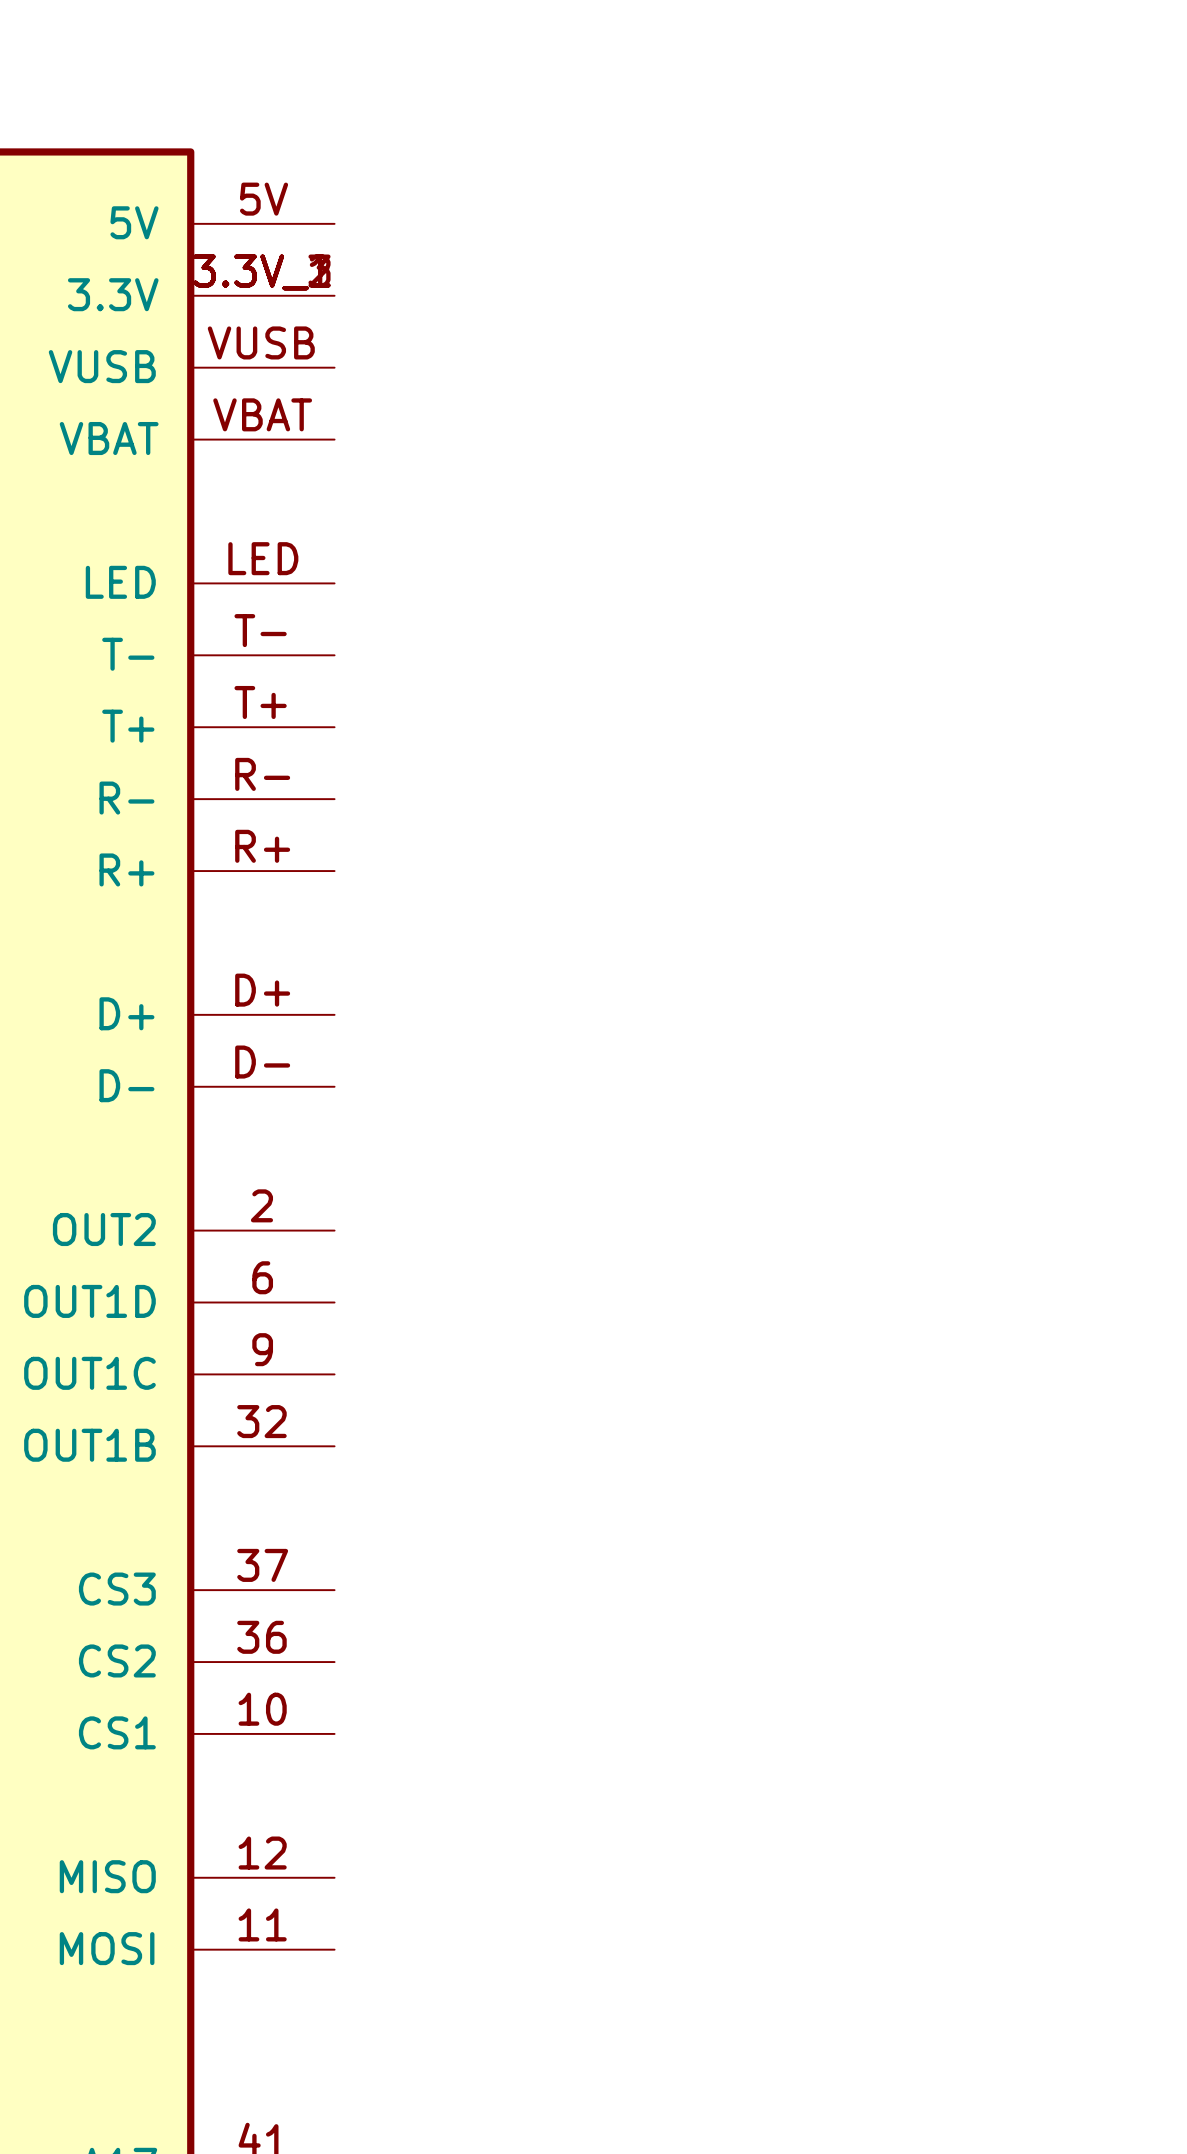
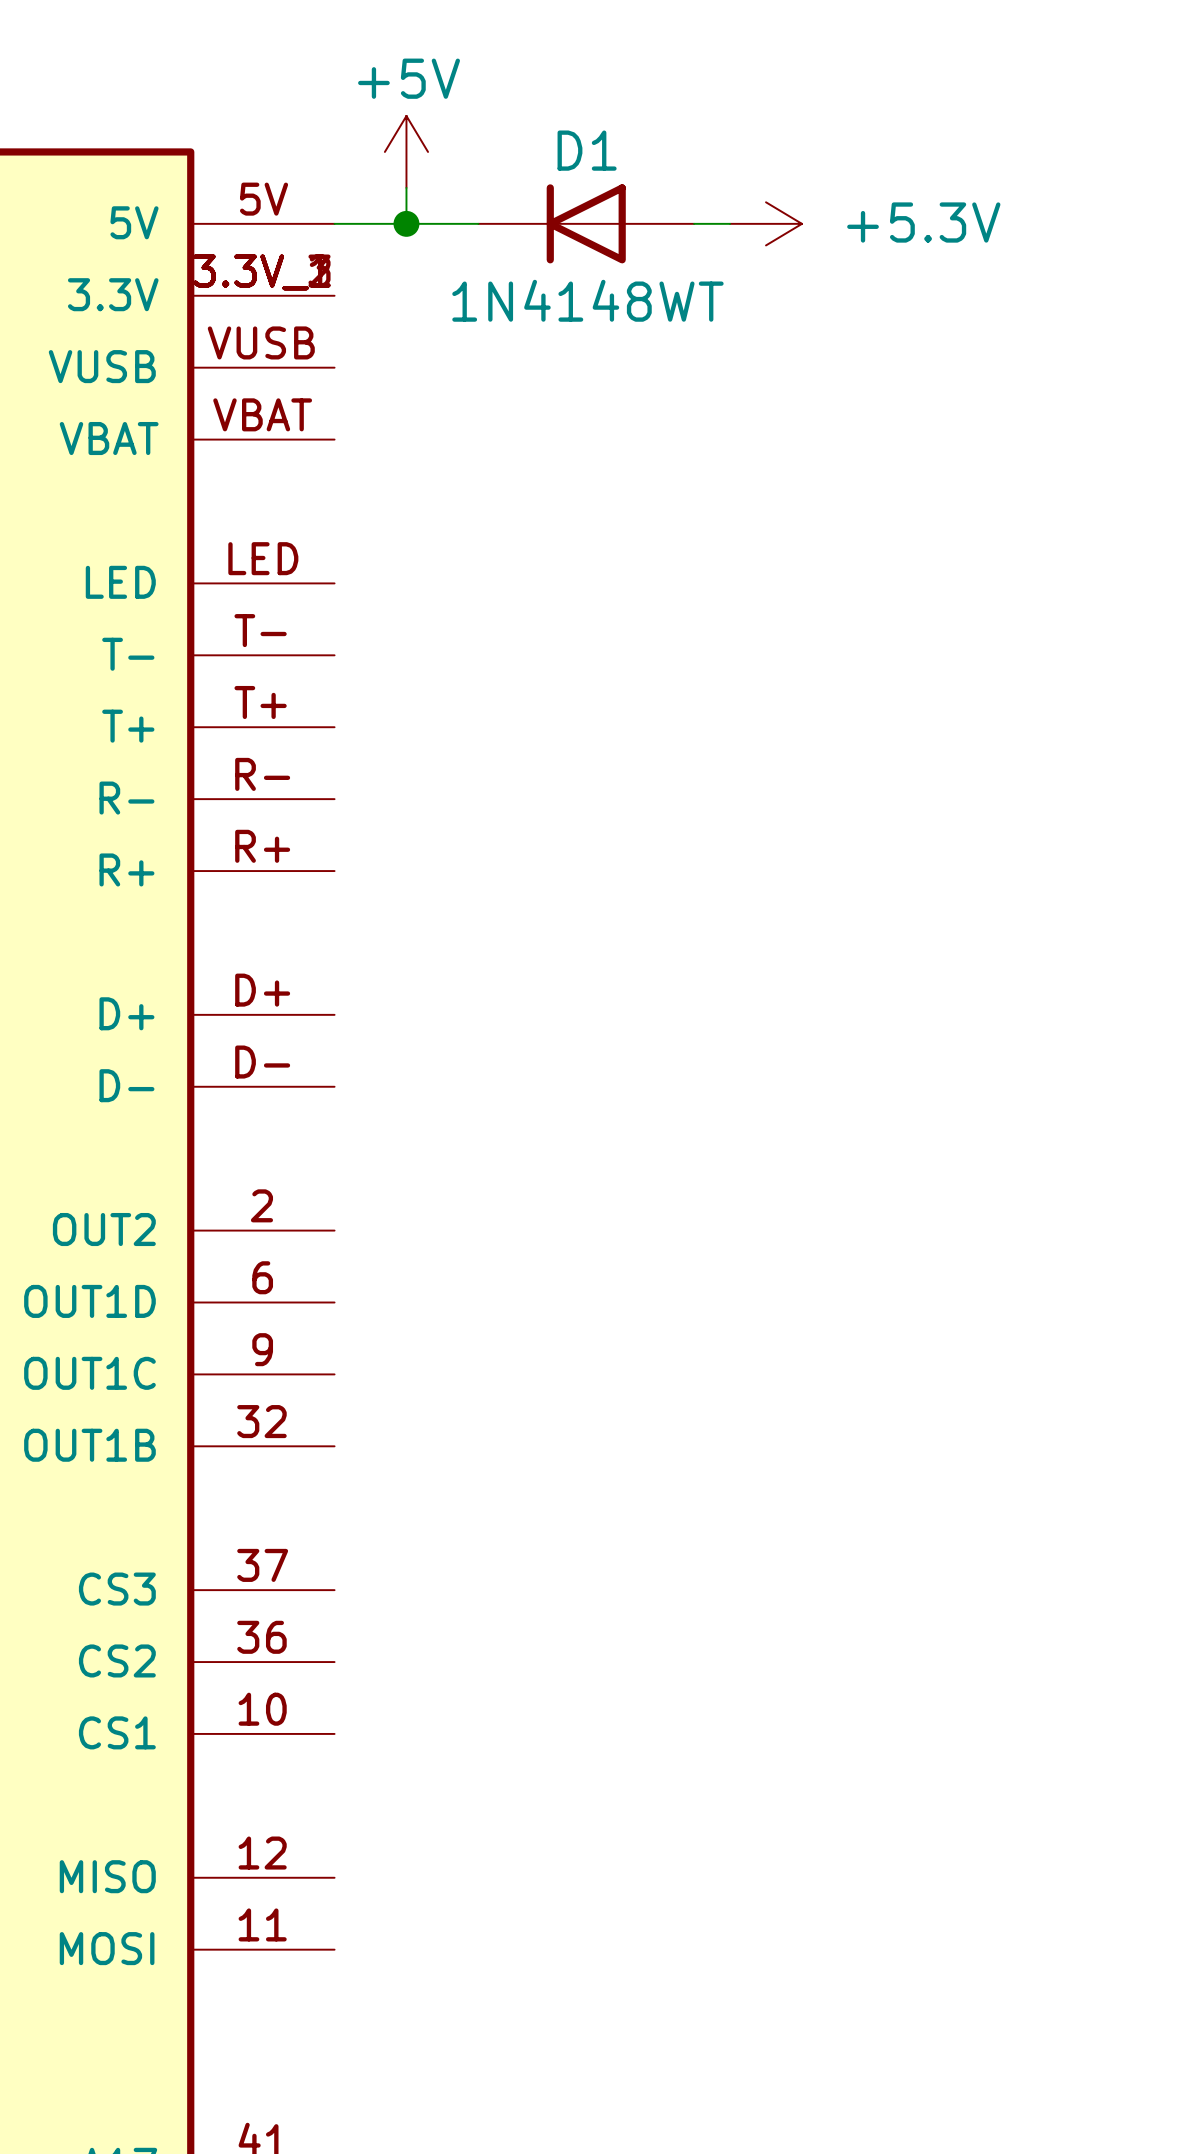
power symbol: none -> +5V (406, 151)
wire: none -> (406, 187) (406, 223)
wire: none -> (334, 223) (478, 223)
junction: none -> (406, 223)
D1: none -> 1N4148WT (586, 223)
wire: none -> (694, 223) (730, 223)
power symbol: none -> +5.3V (766, 223)

